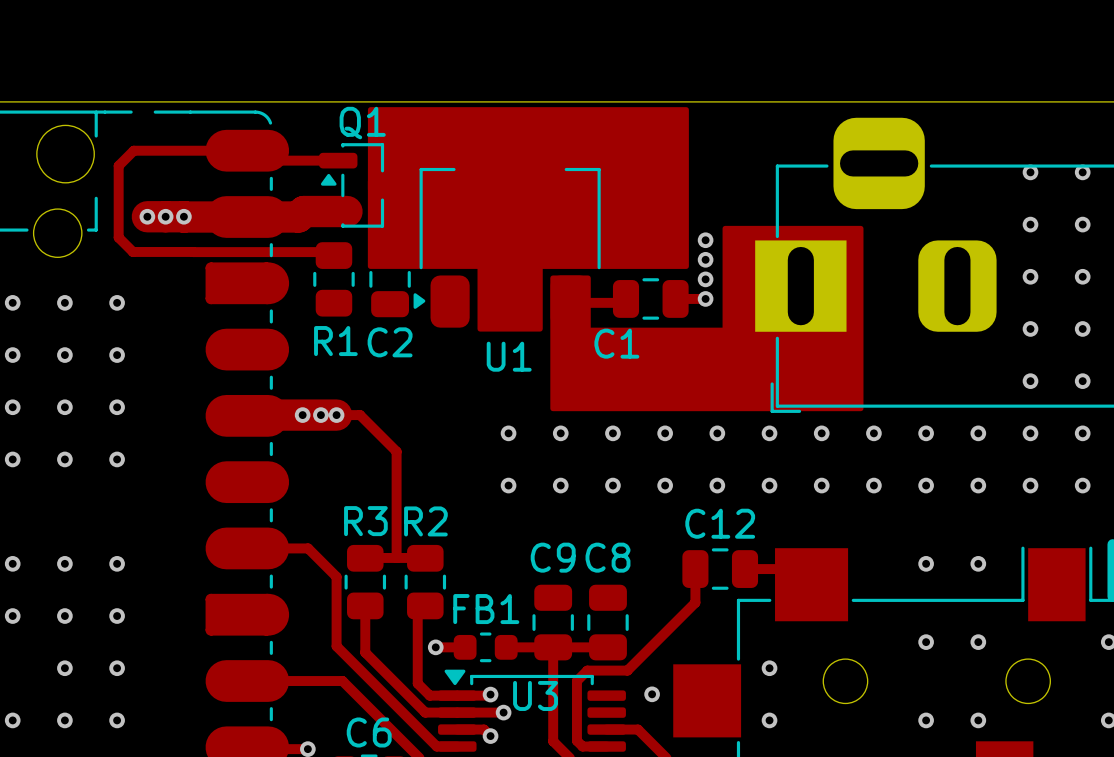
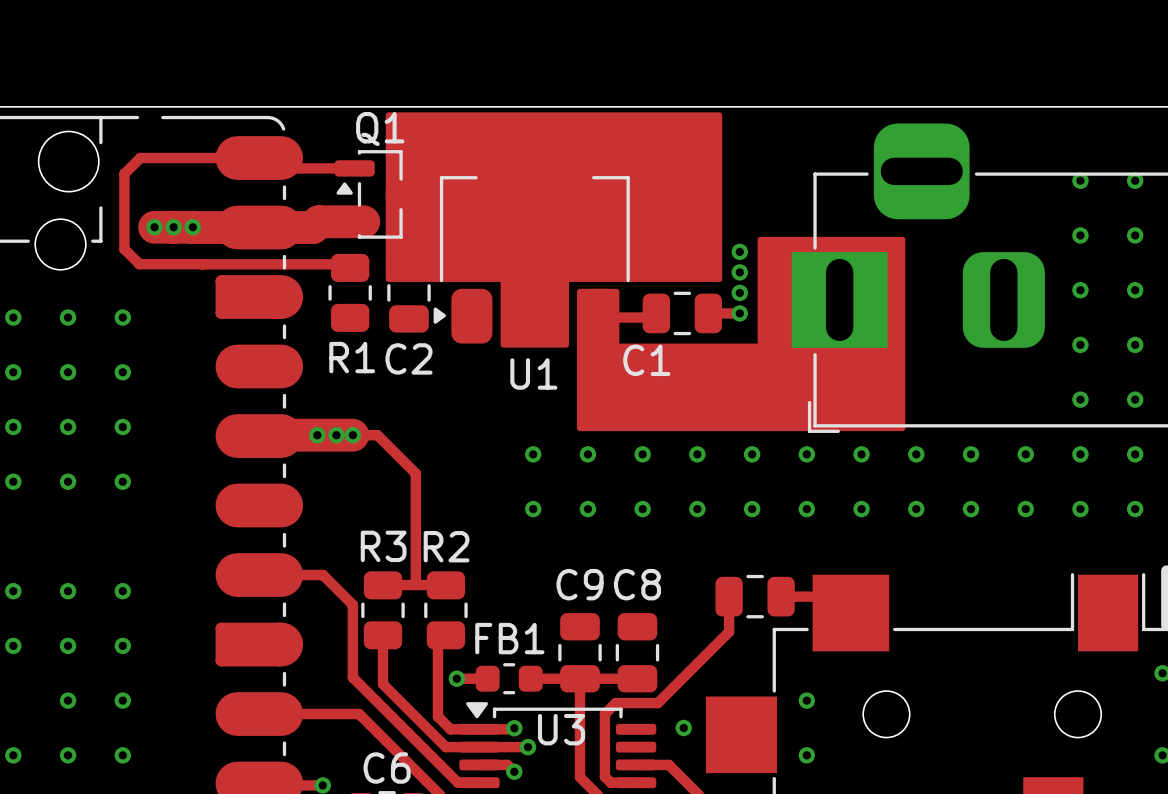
C12 name: C12 (720, 523) -> none
via: (926, 563) -> none
via: (978, 563) -> none
via: (926, 642) -> none
via: (978, 642) -> none
via: (926, 720) -> none
via: (978, 720) -> none

